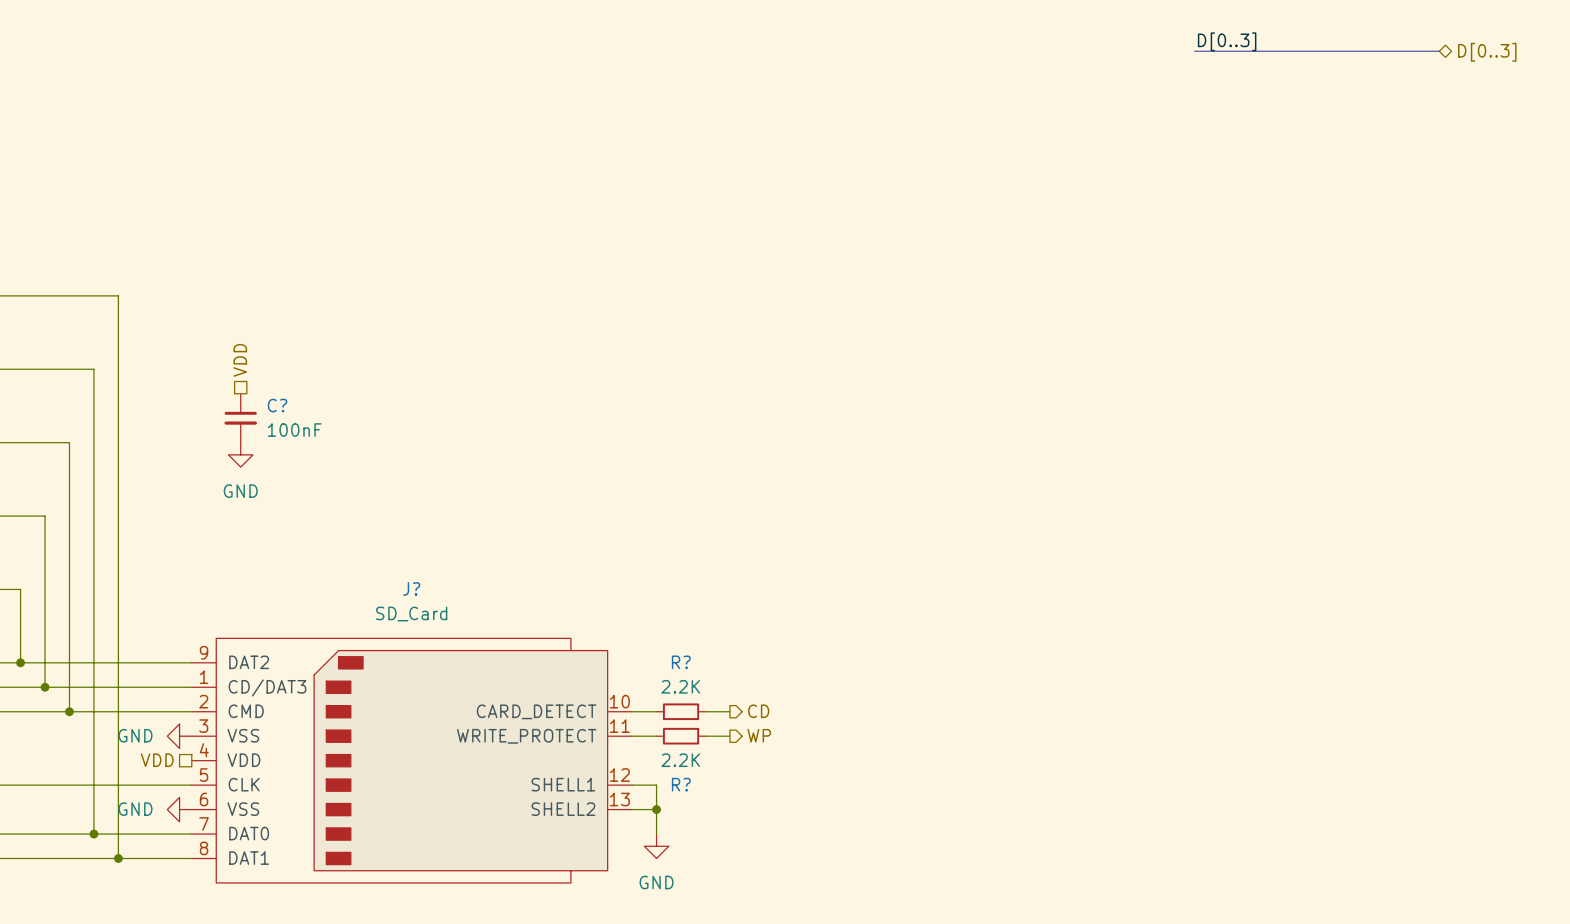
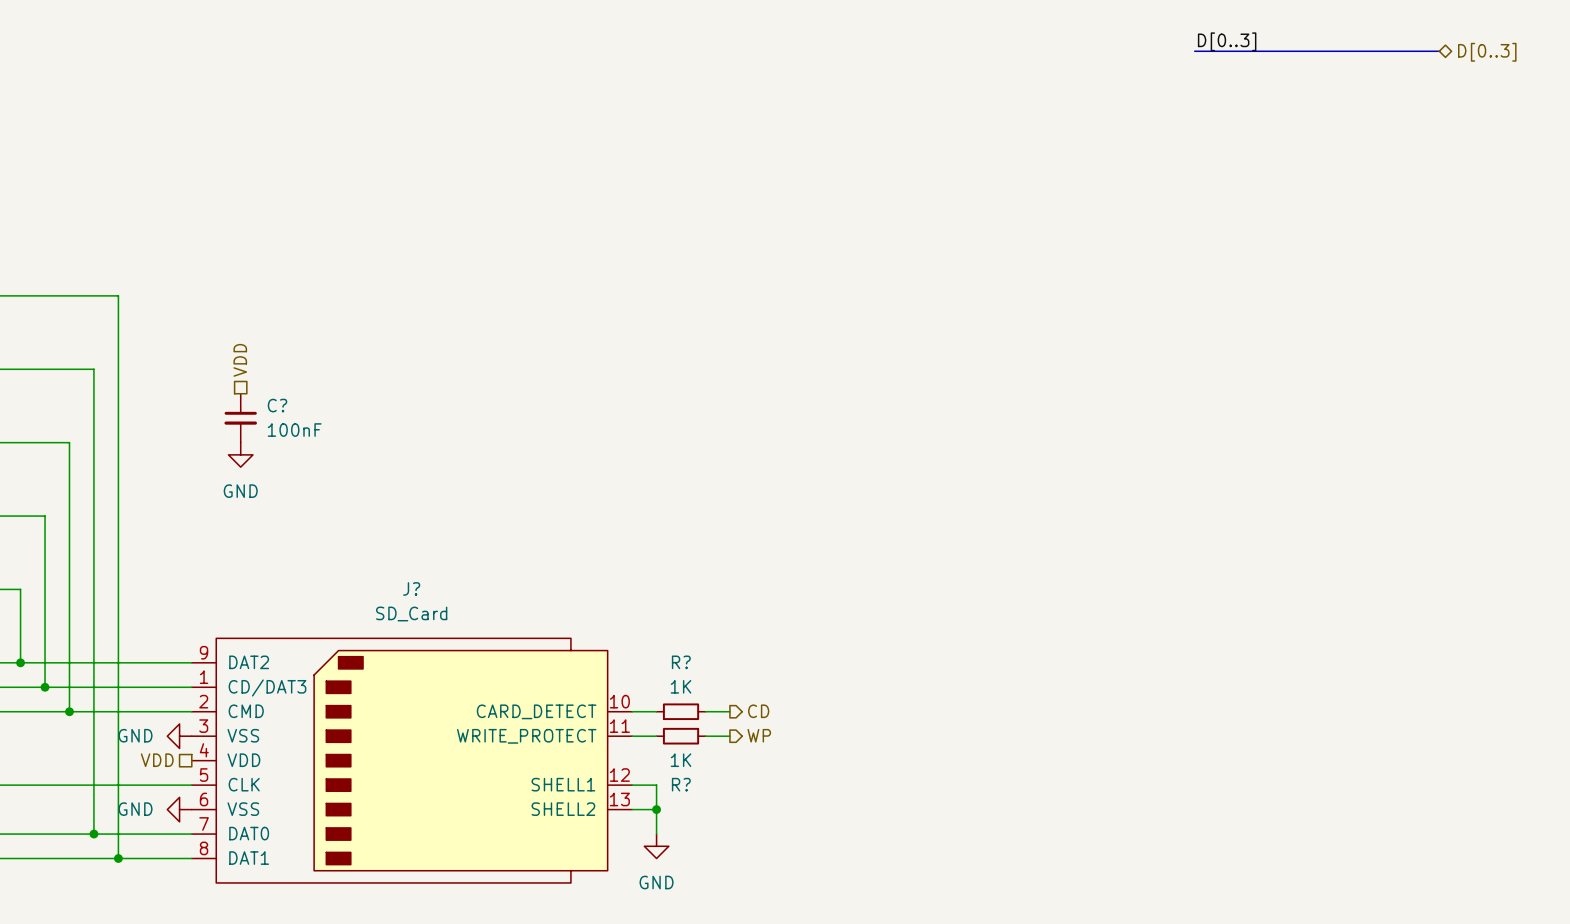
R? value: 2.2K (680, 686) -> 1K (681, 686)
R? value: 2.2K (680, 760) -> 1K (681, 760)

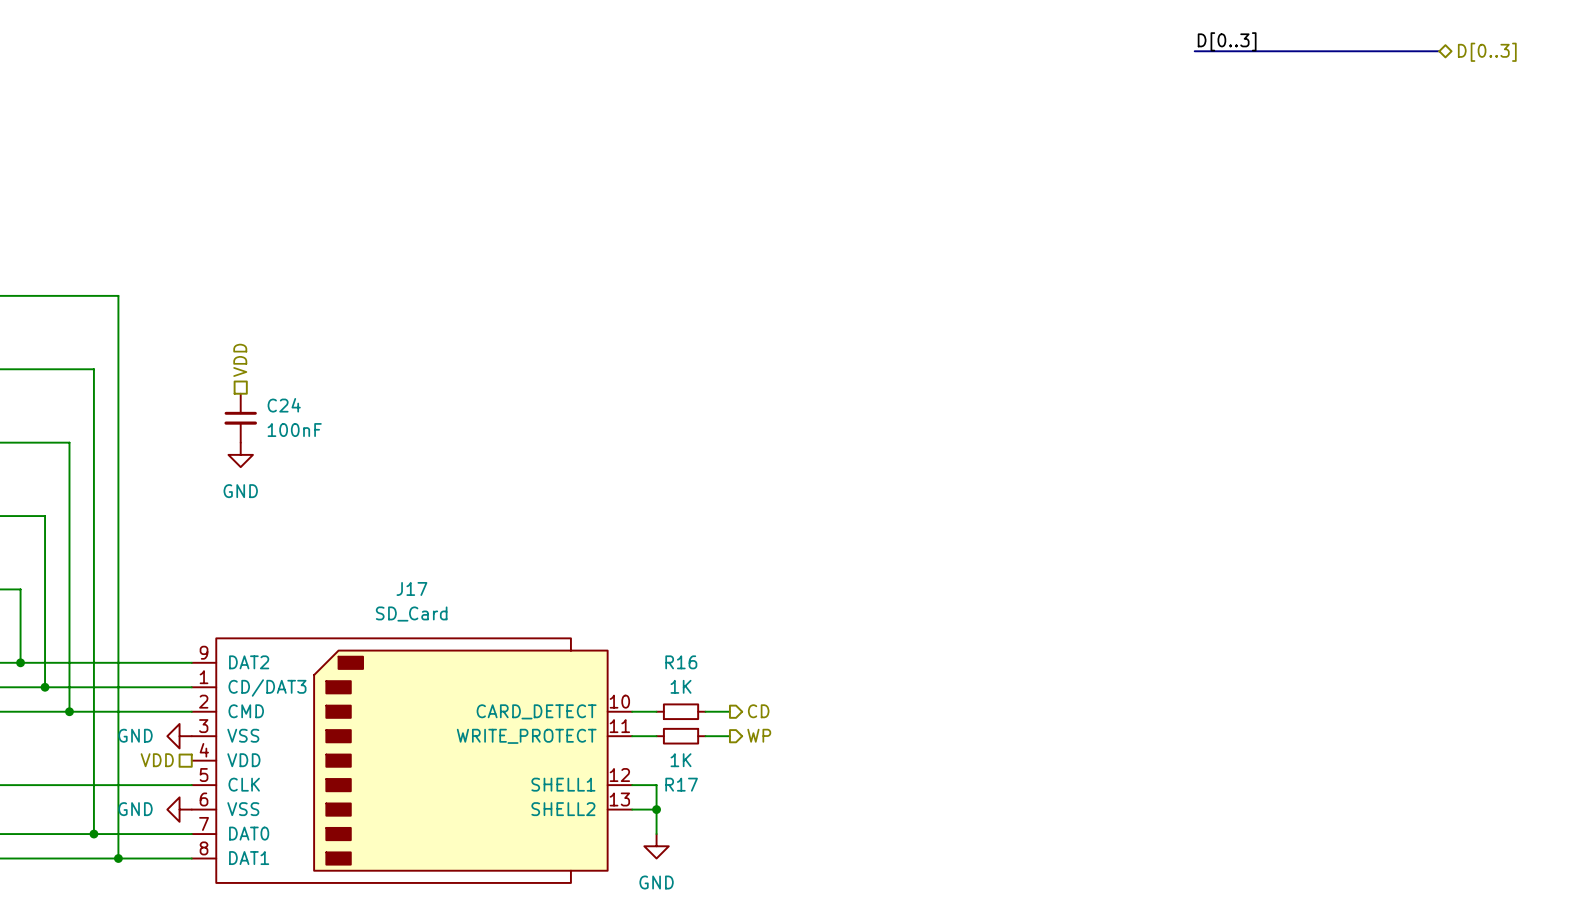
C? name: C? (277, 405) -> C24 (284, 405)
J? name: J? (411, 588) -> J17 (411, 588)
R? name: R? (681, 662) -> R16 (681, 662)
R? name: R? (681, 784) -> R17 (681, 784)

